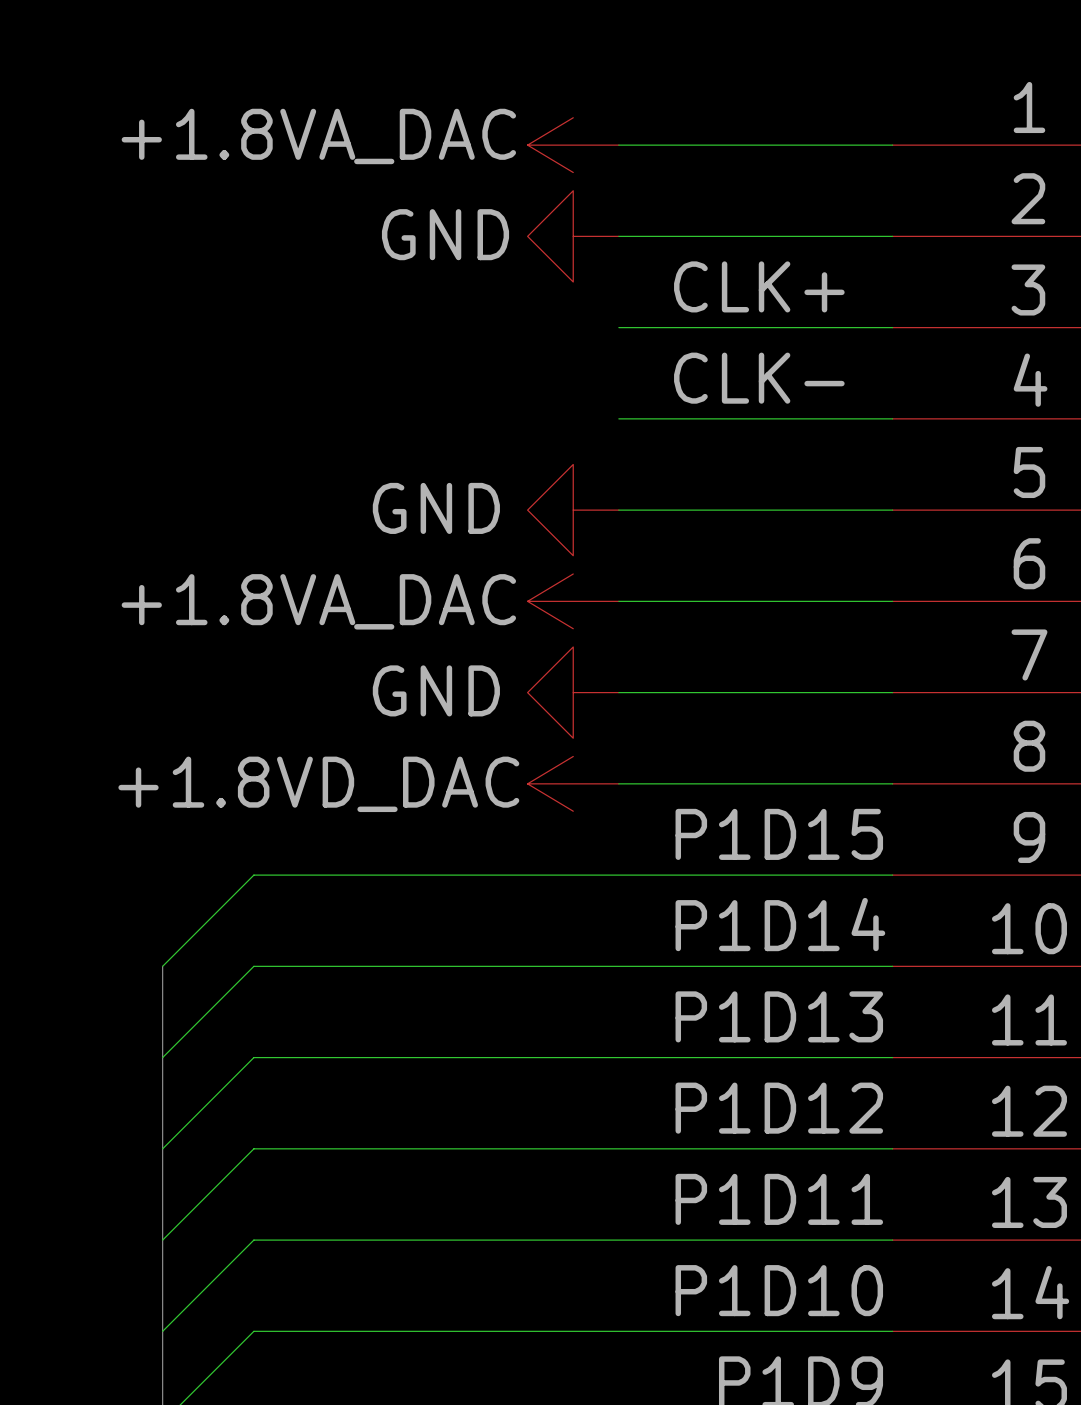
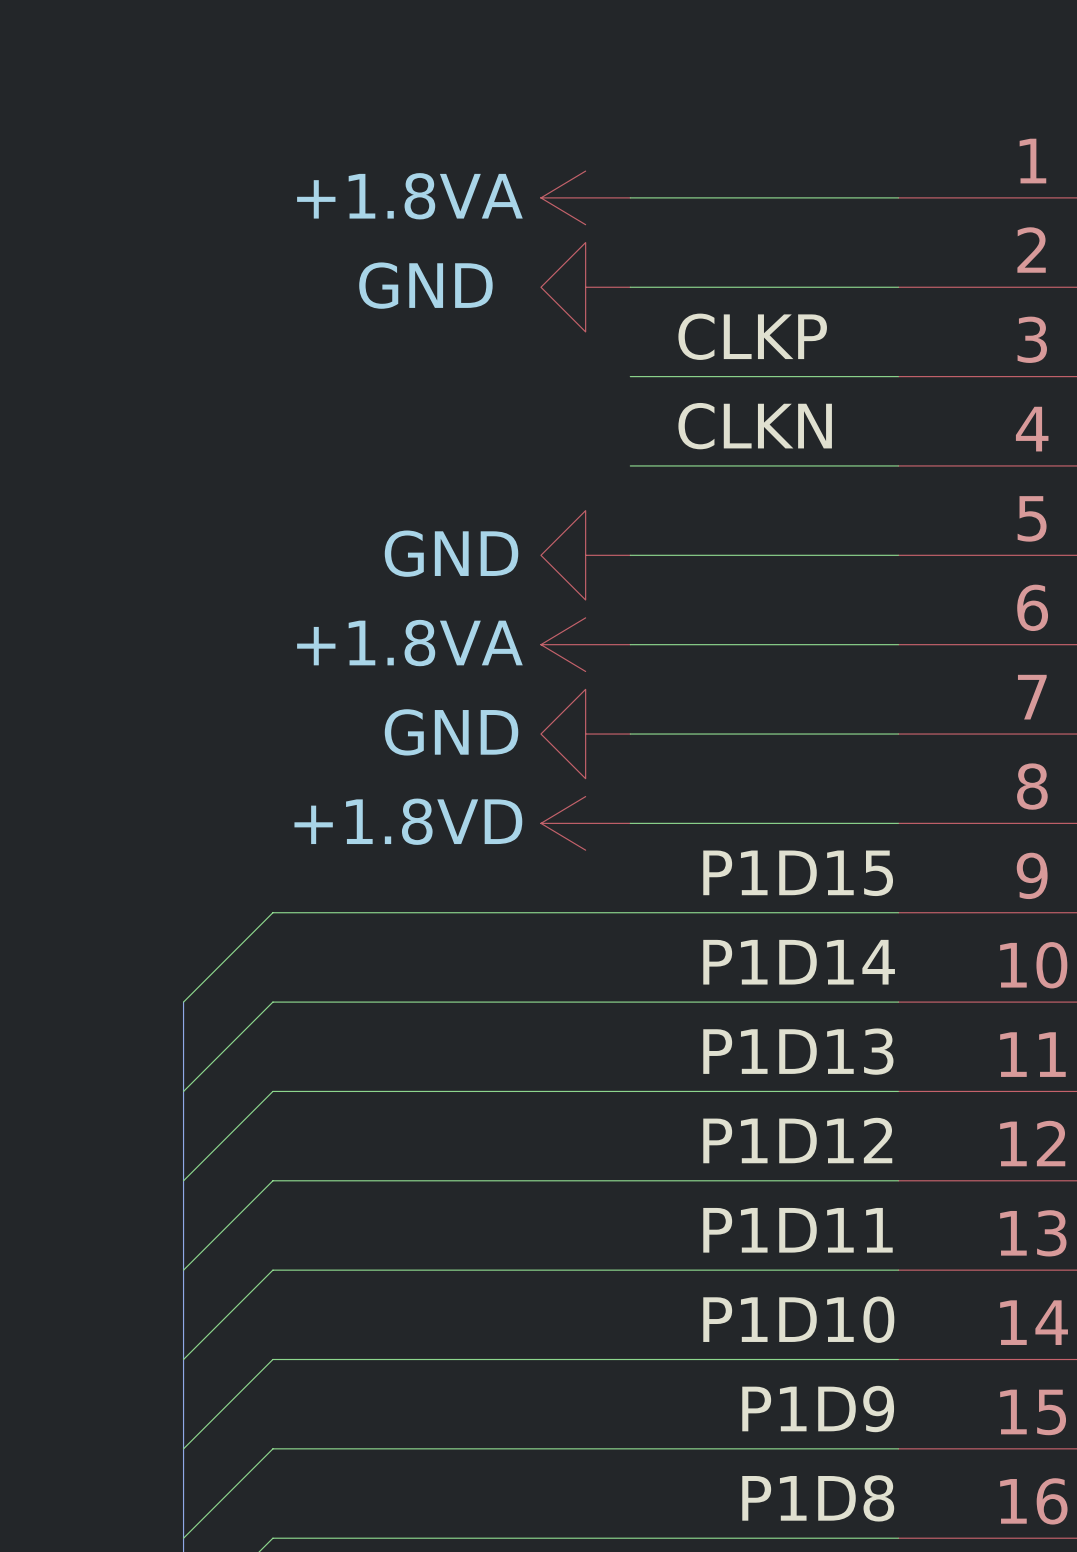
power symbol: +1.8VA_DAC (573, 145) -> +1.8VA (585, 197)
power symbol text position: GND (445, 234) -> GND (425, 285)
label: CLK+ (759, 286) -> CLKP (752, 336)
label: CLK- (759, 378) -> CLKN (755, 426)
power symbol: +1.8VA_DAC (573, 601) -> +1.8VA (585, 644)
power symbol: +1.8VD_DAC (573, 783) -> +1.8VD (585, 823)

